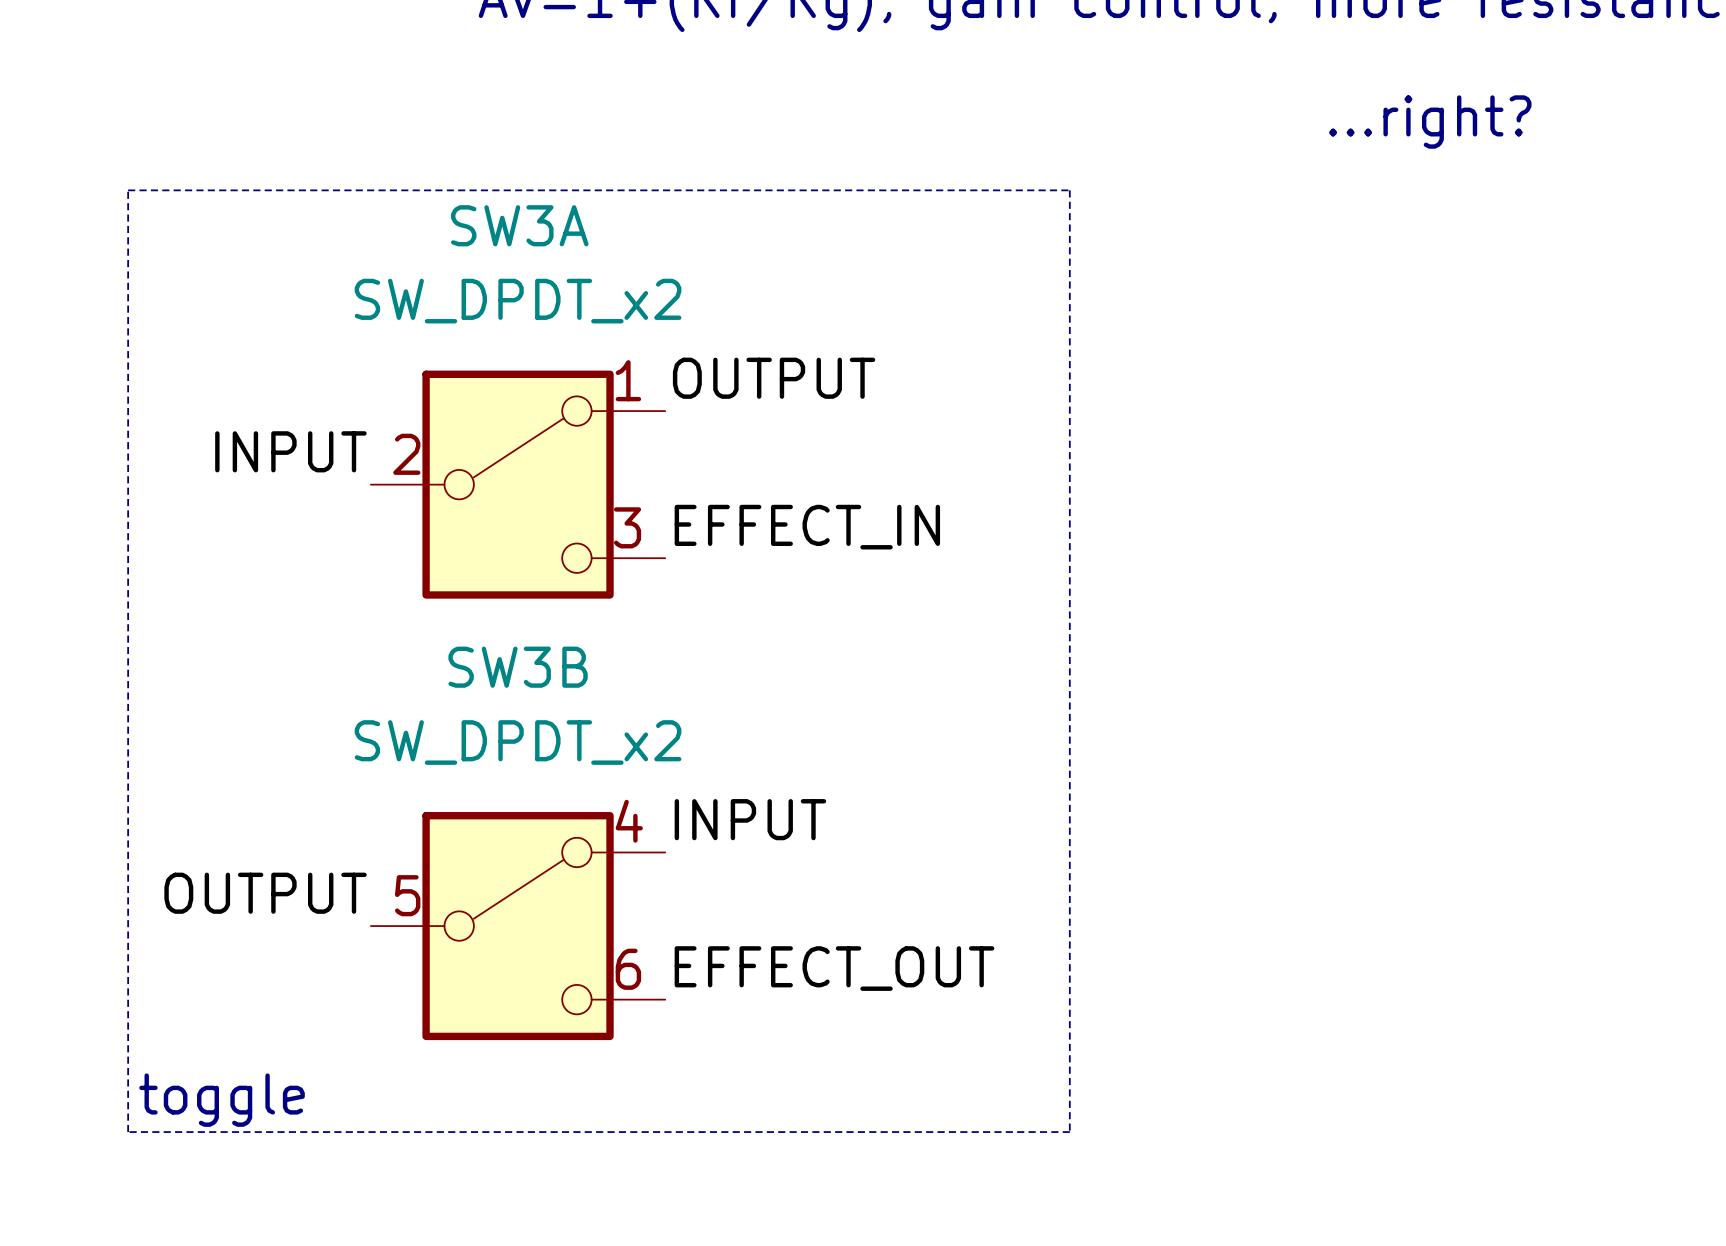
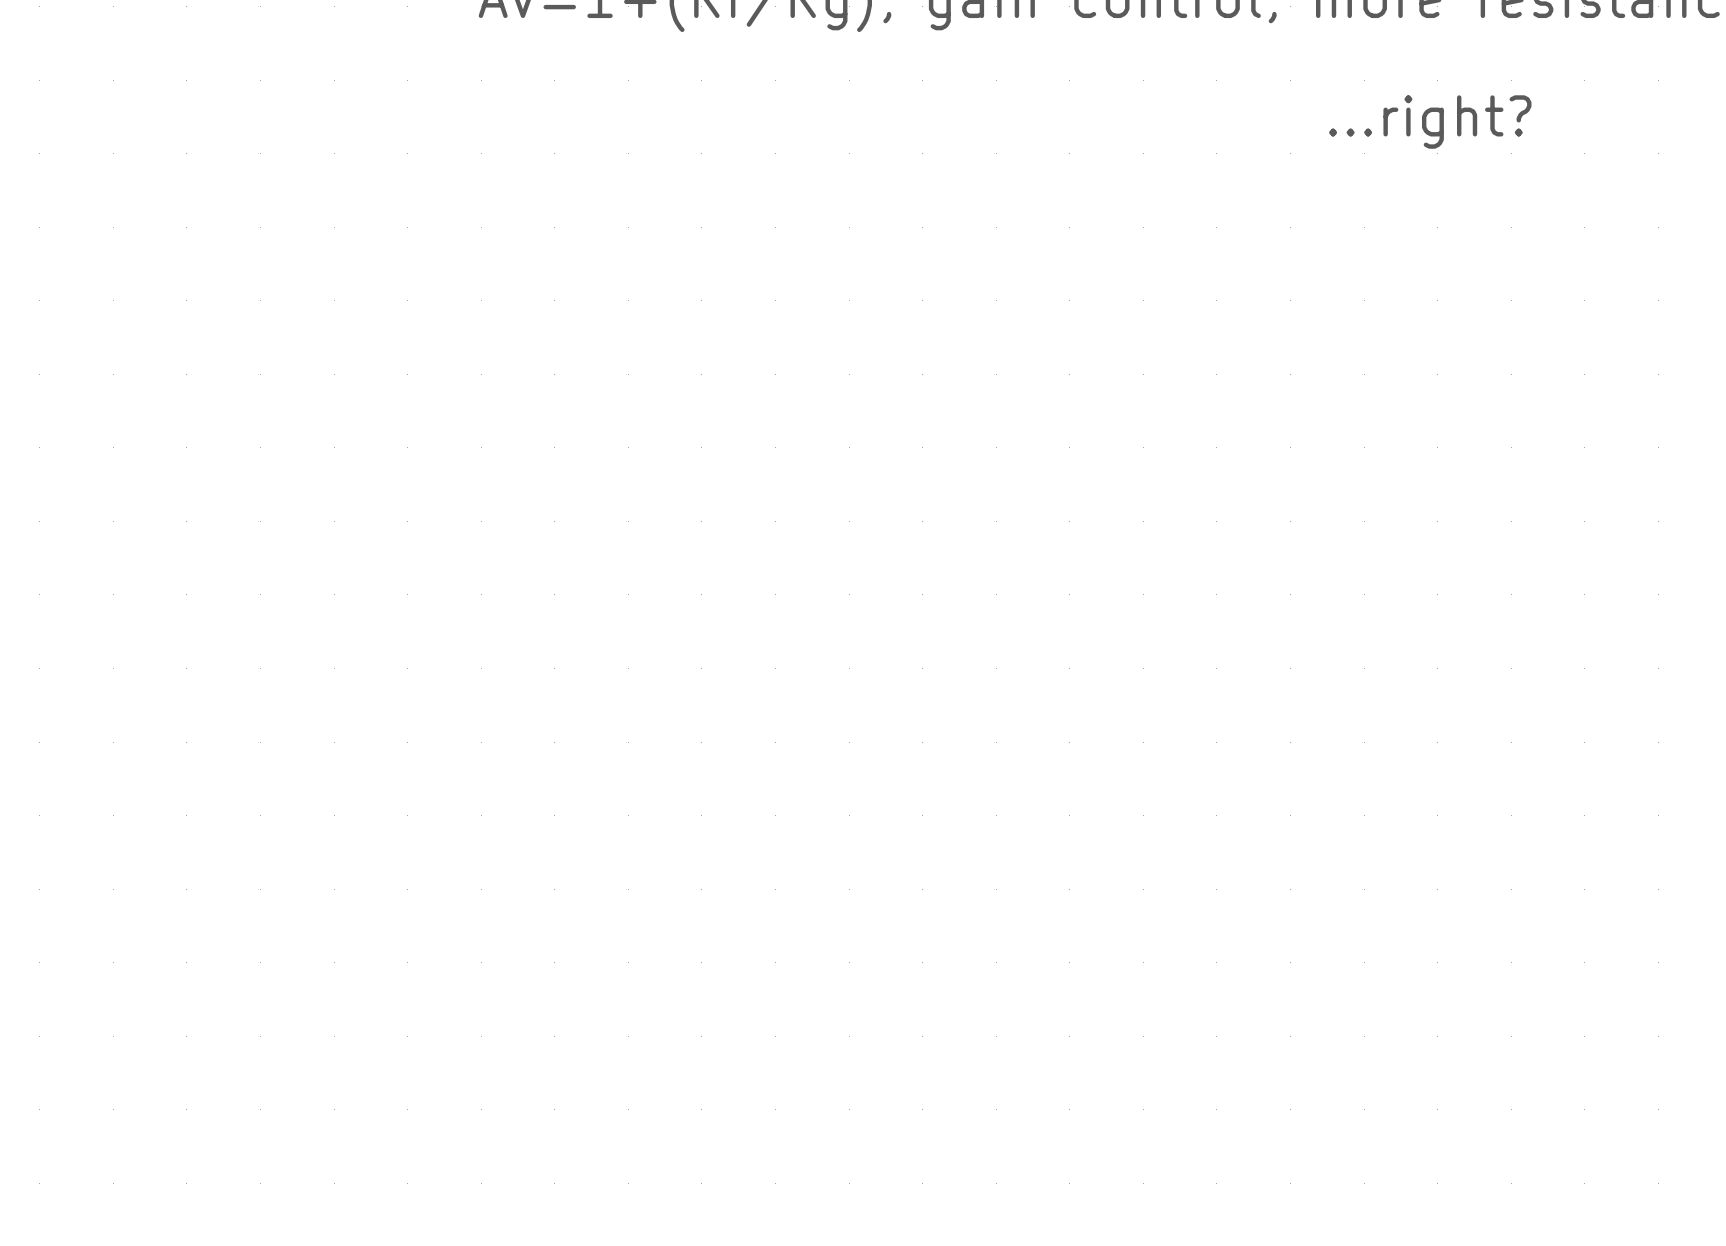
line: (128, 190) (1069, 190) (1069, 1132) (128, 1132) (128, 190) -> none
label: OUTPUT (774, 378) -> none
label: INPUT (290, 451) -> none
SW3A: SW_DPDT_x2 (518, 484) -> none
label: EFFECT_IN (807, 527) -> none
label: INPUT (750, 819) -> none
label: OUTPUT (265, 893) -> none
SW3B: SW_DPDT_x2 (518, 926) -> none
label: EFFECT_OUT (834, 968) -> none
text: toggle (222, 1100) -> none

